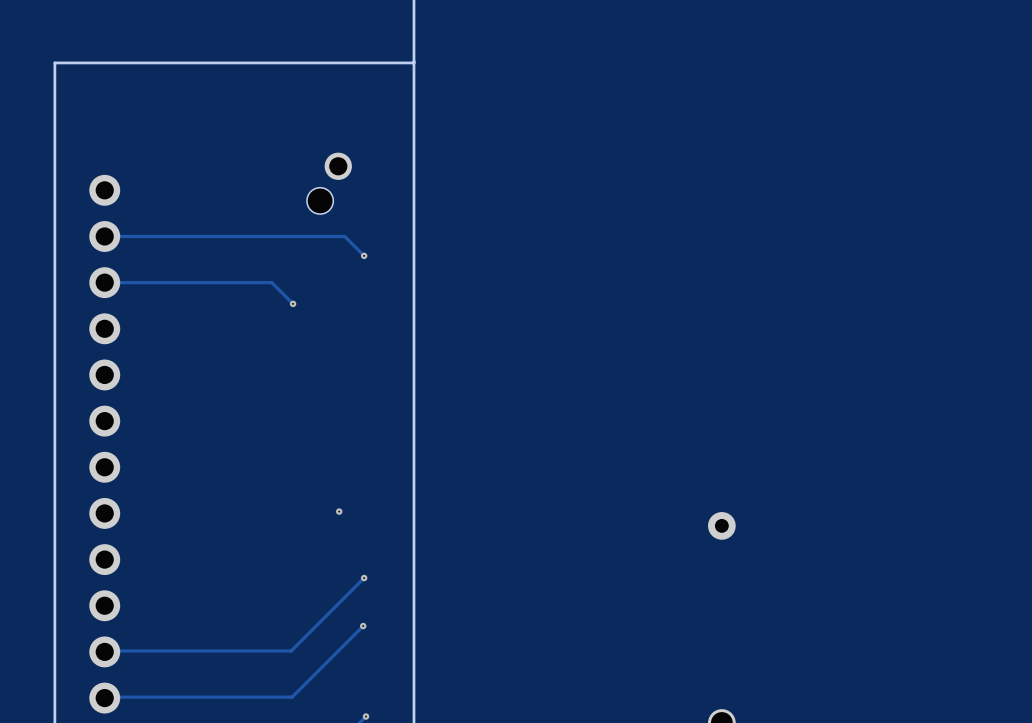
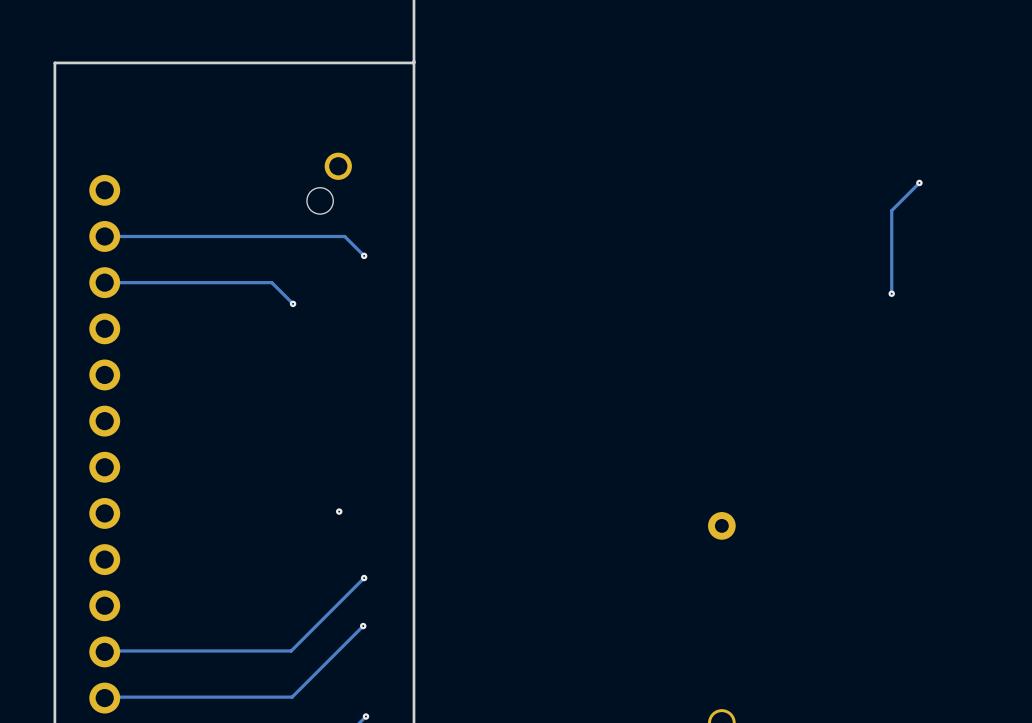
track: none -> (919, 182) (891, 210) (891, 293)
via: none -> (919, 182)
via: none -> (891, 293)

